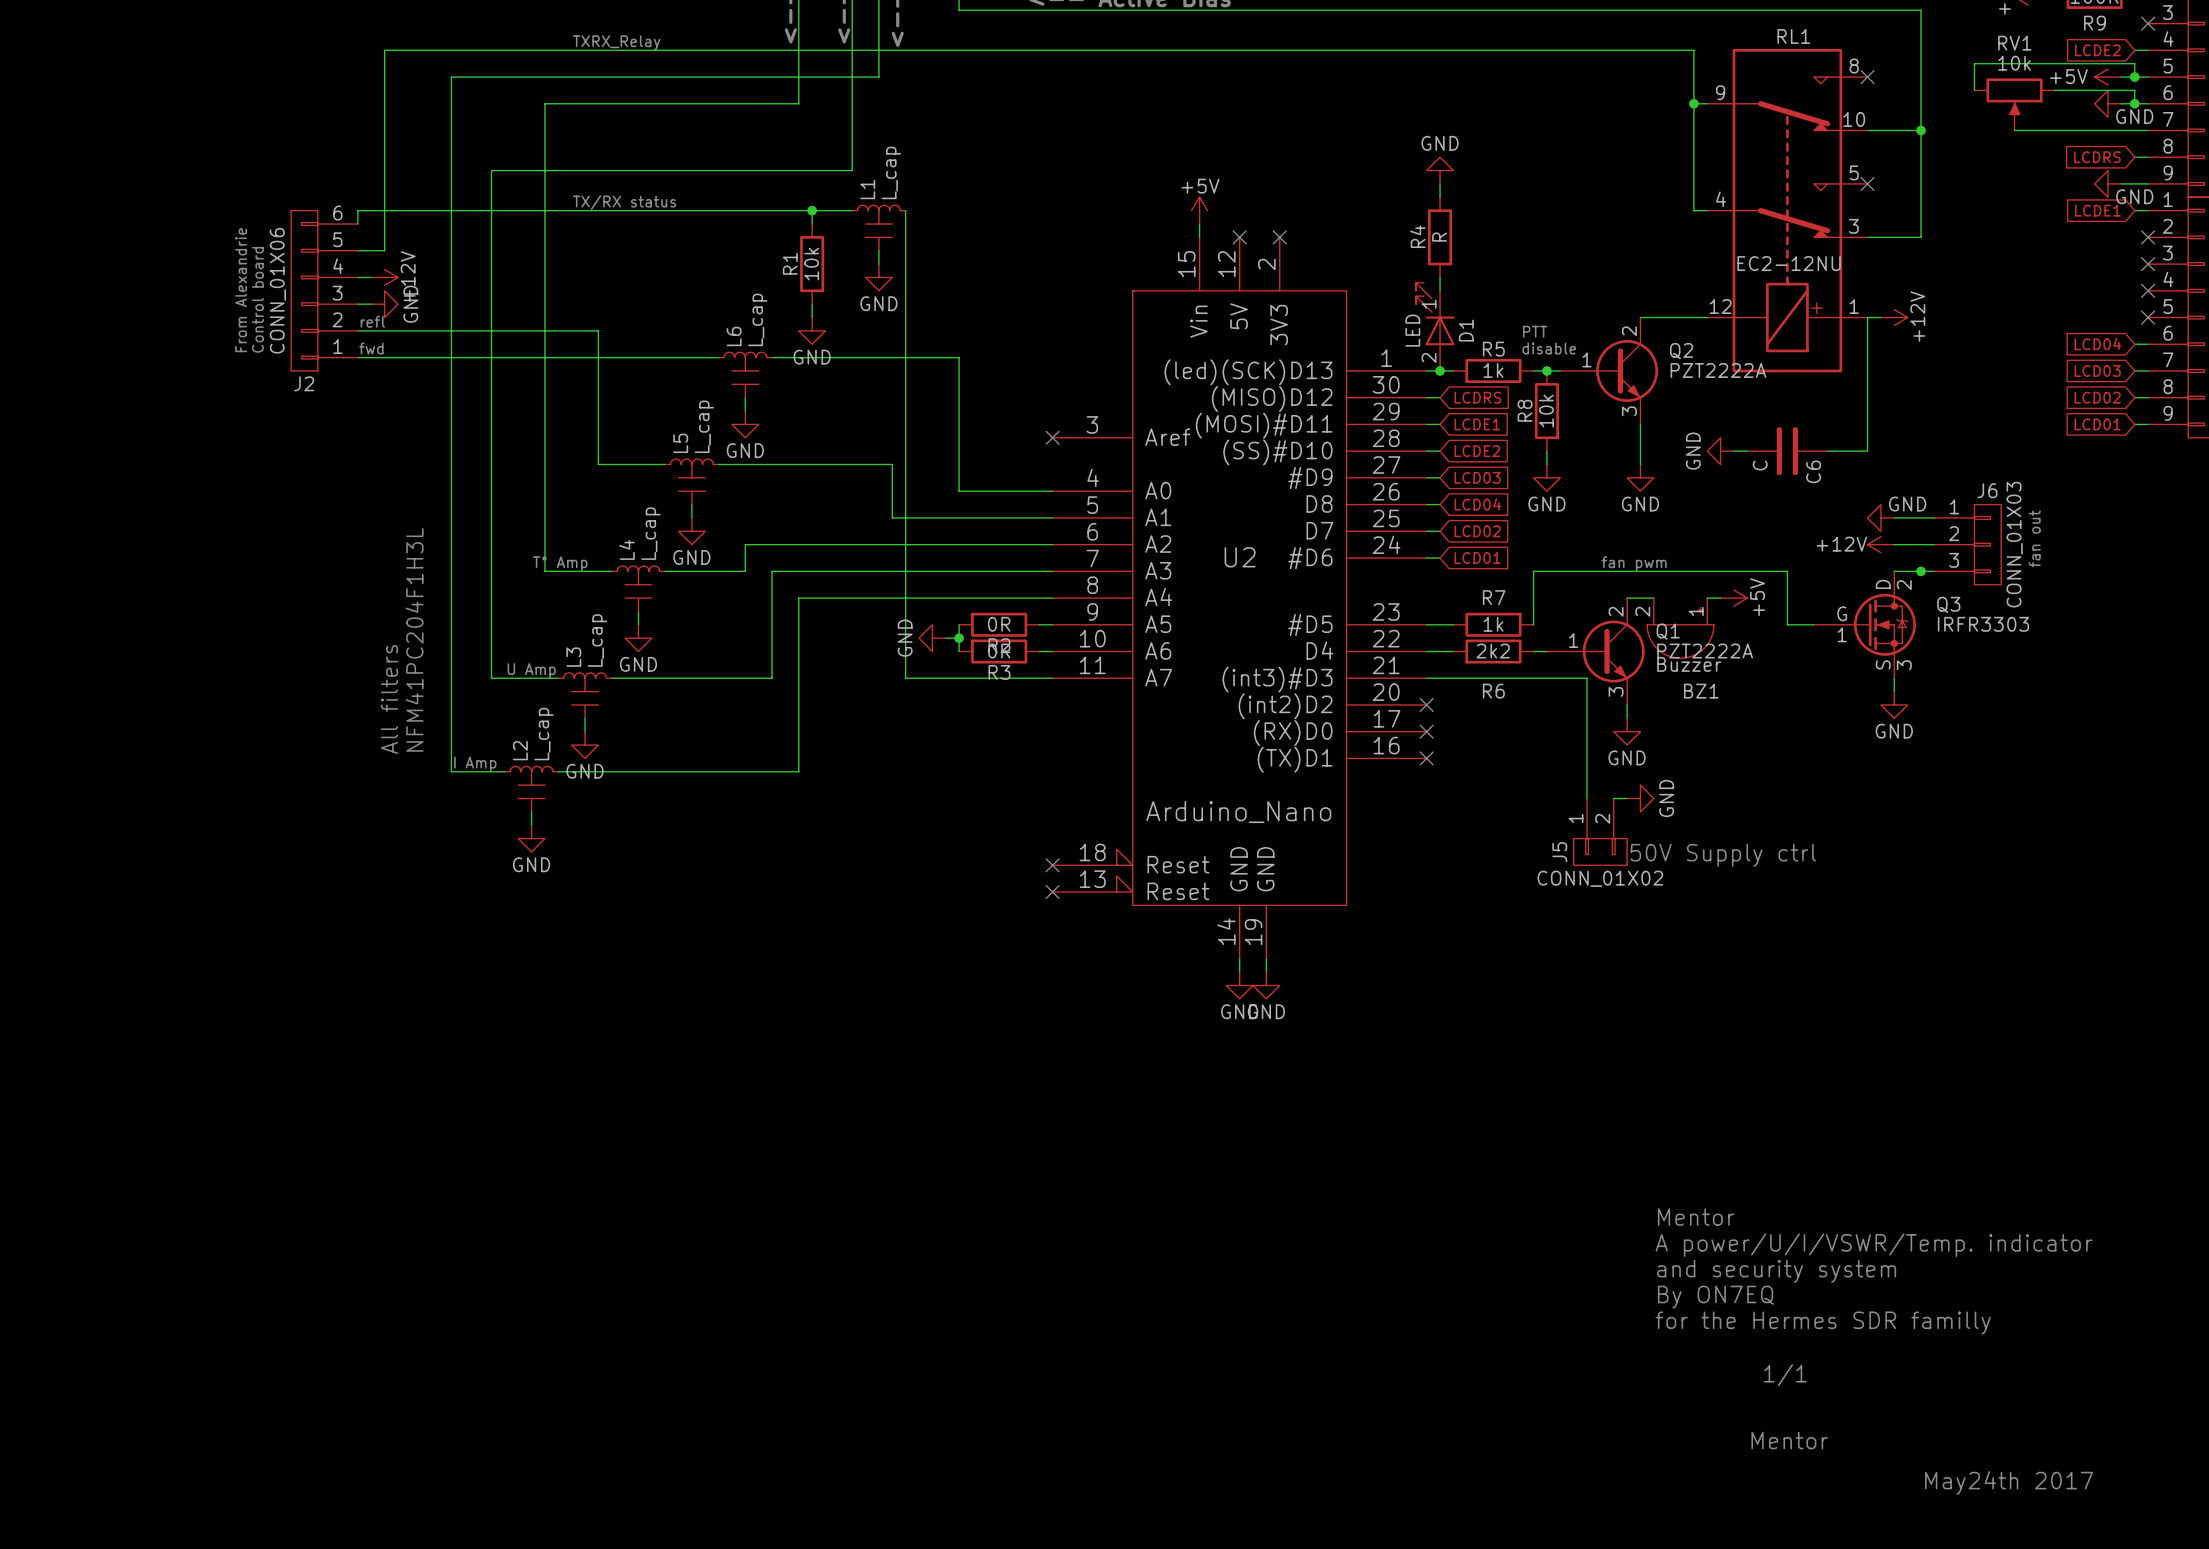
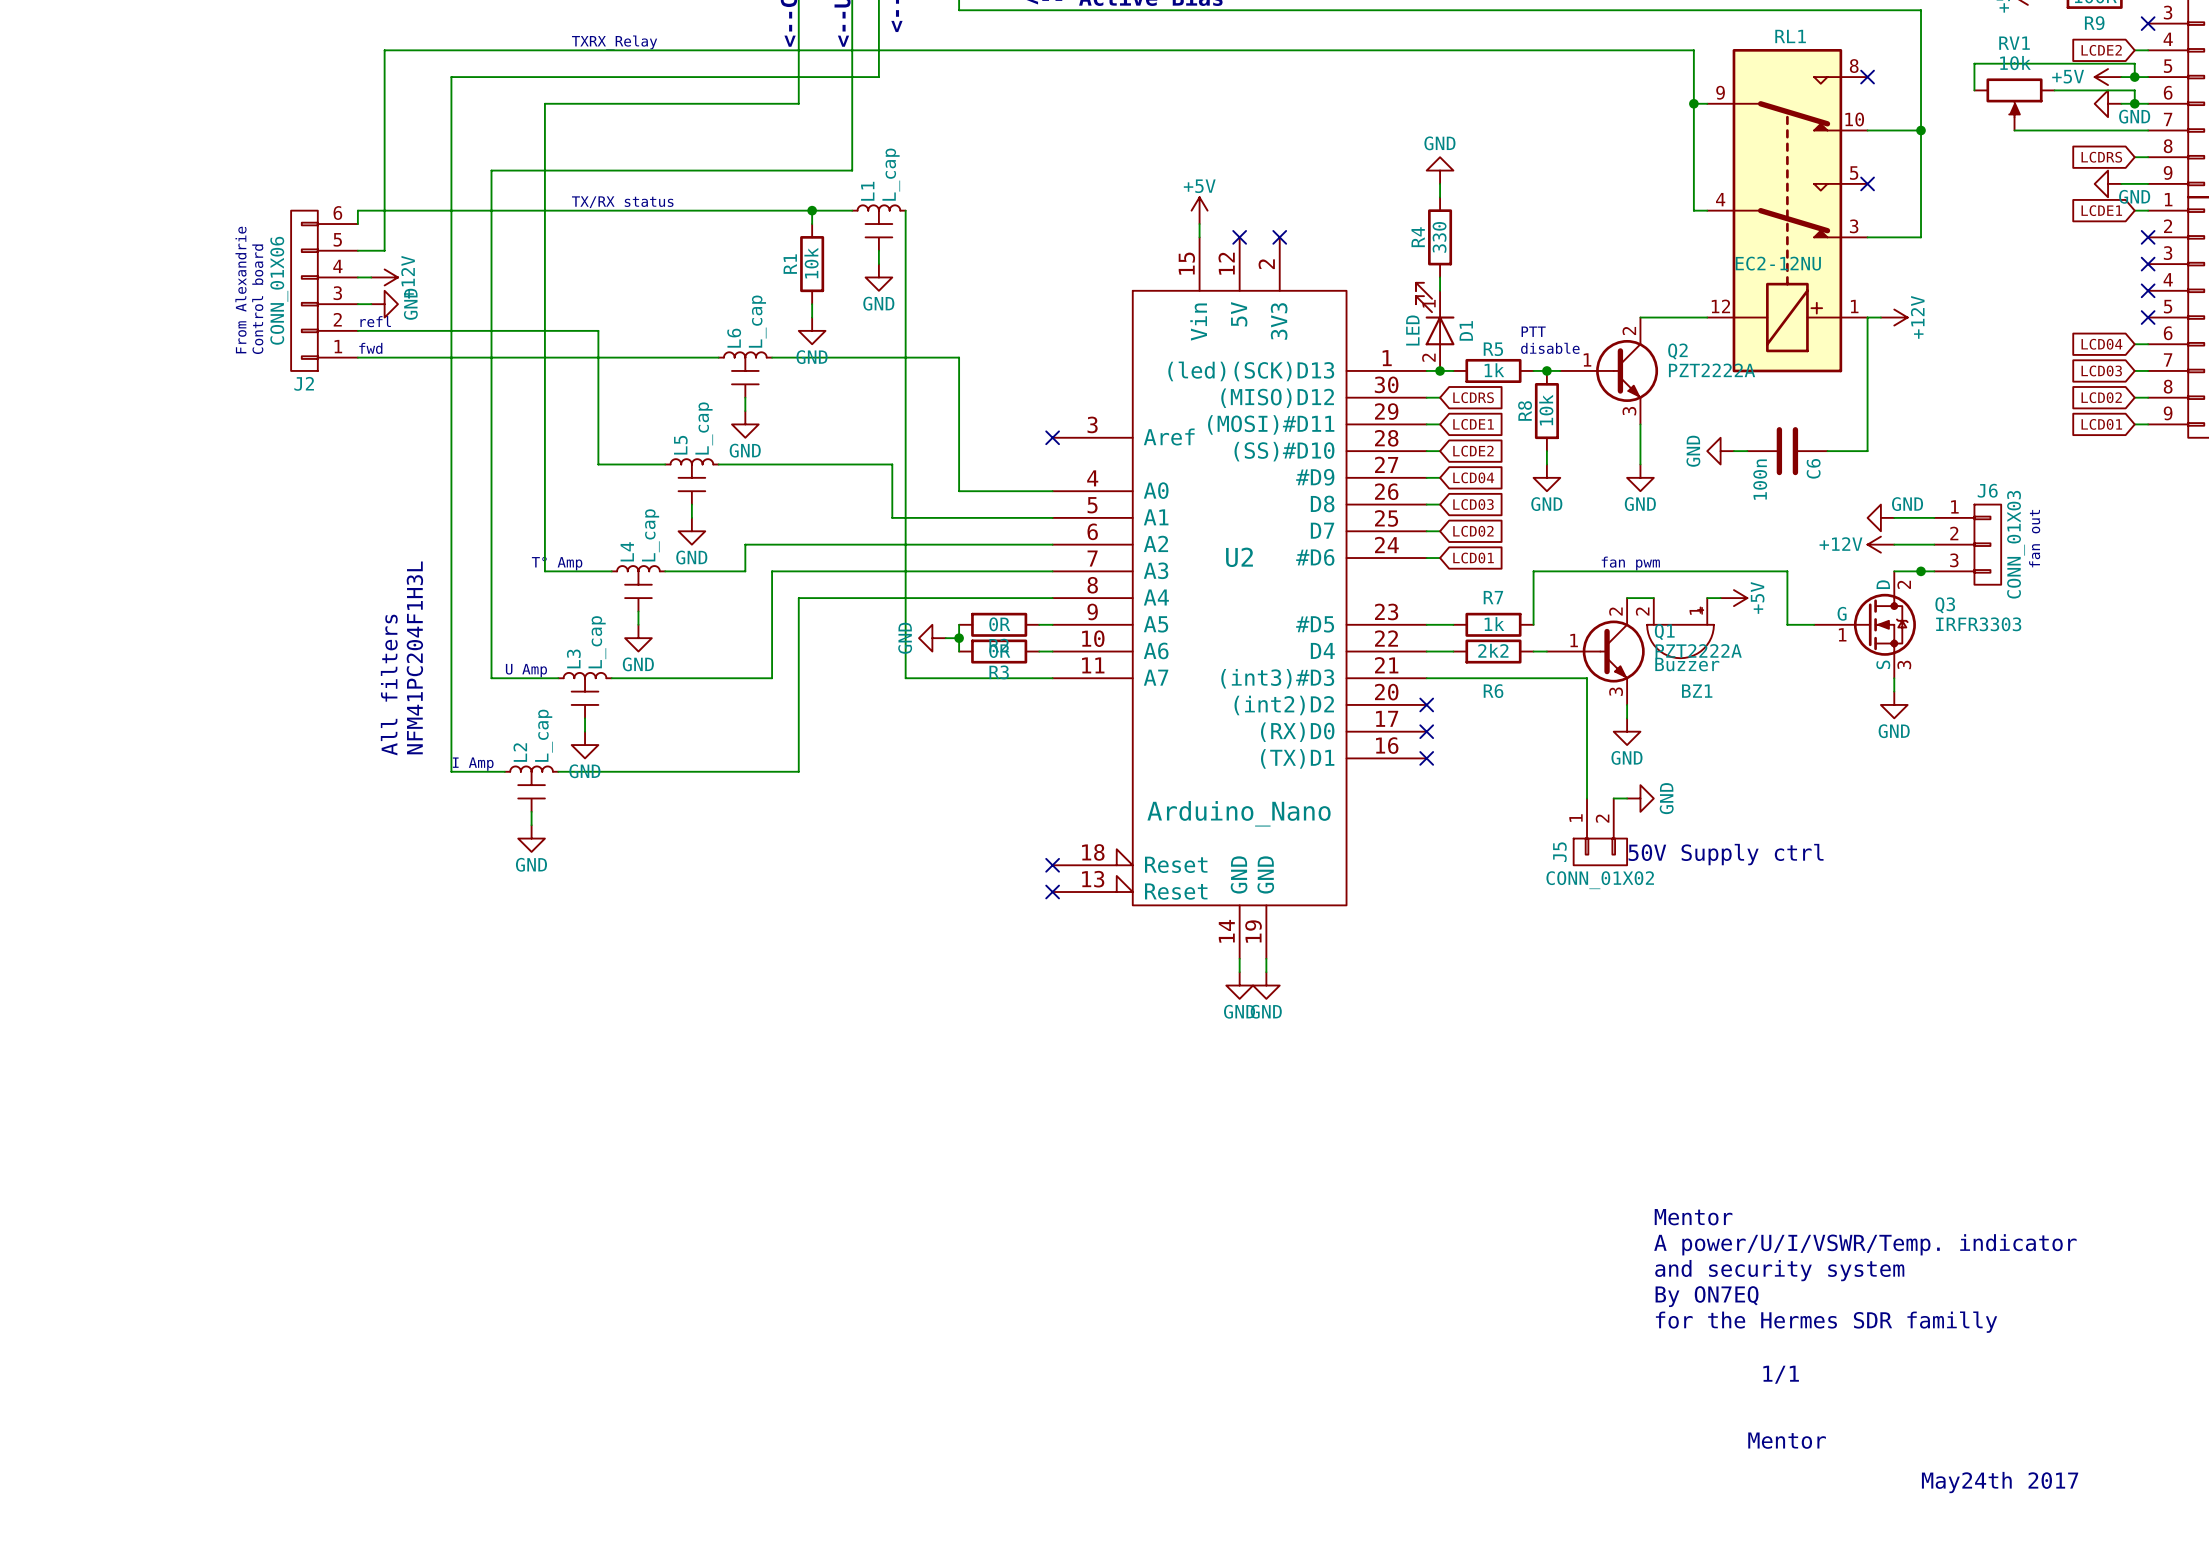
R4 value: R (1439, 237) -> 330 (1439, 237)
C6 value: C (1760, 465) -> 100n (1760, 479)
global label: LCD03 (1477, 477) -> LCD04 (1473, 477)
global label: LCD04 (1477, 504) -> LCD03 (1473, 504)

